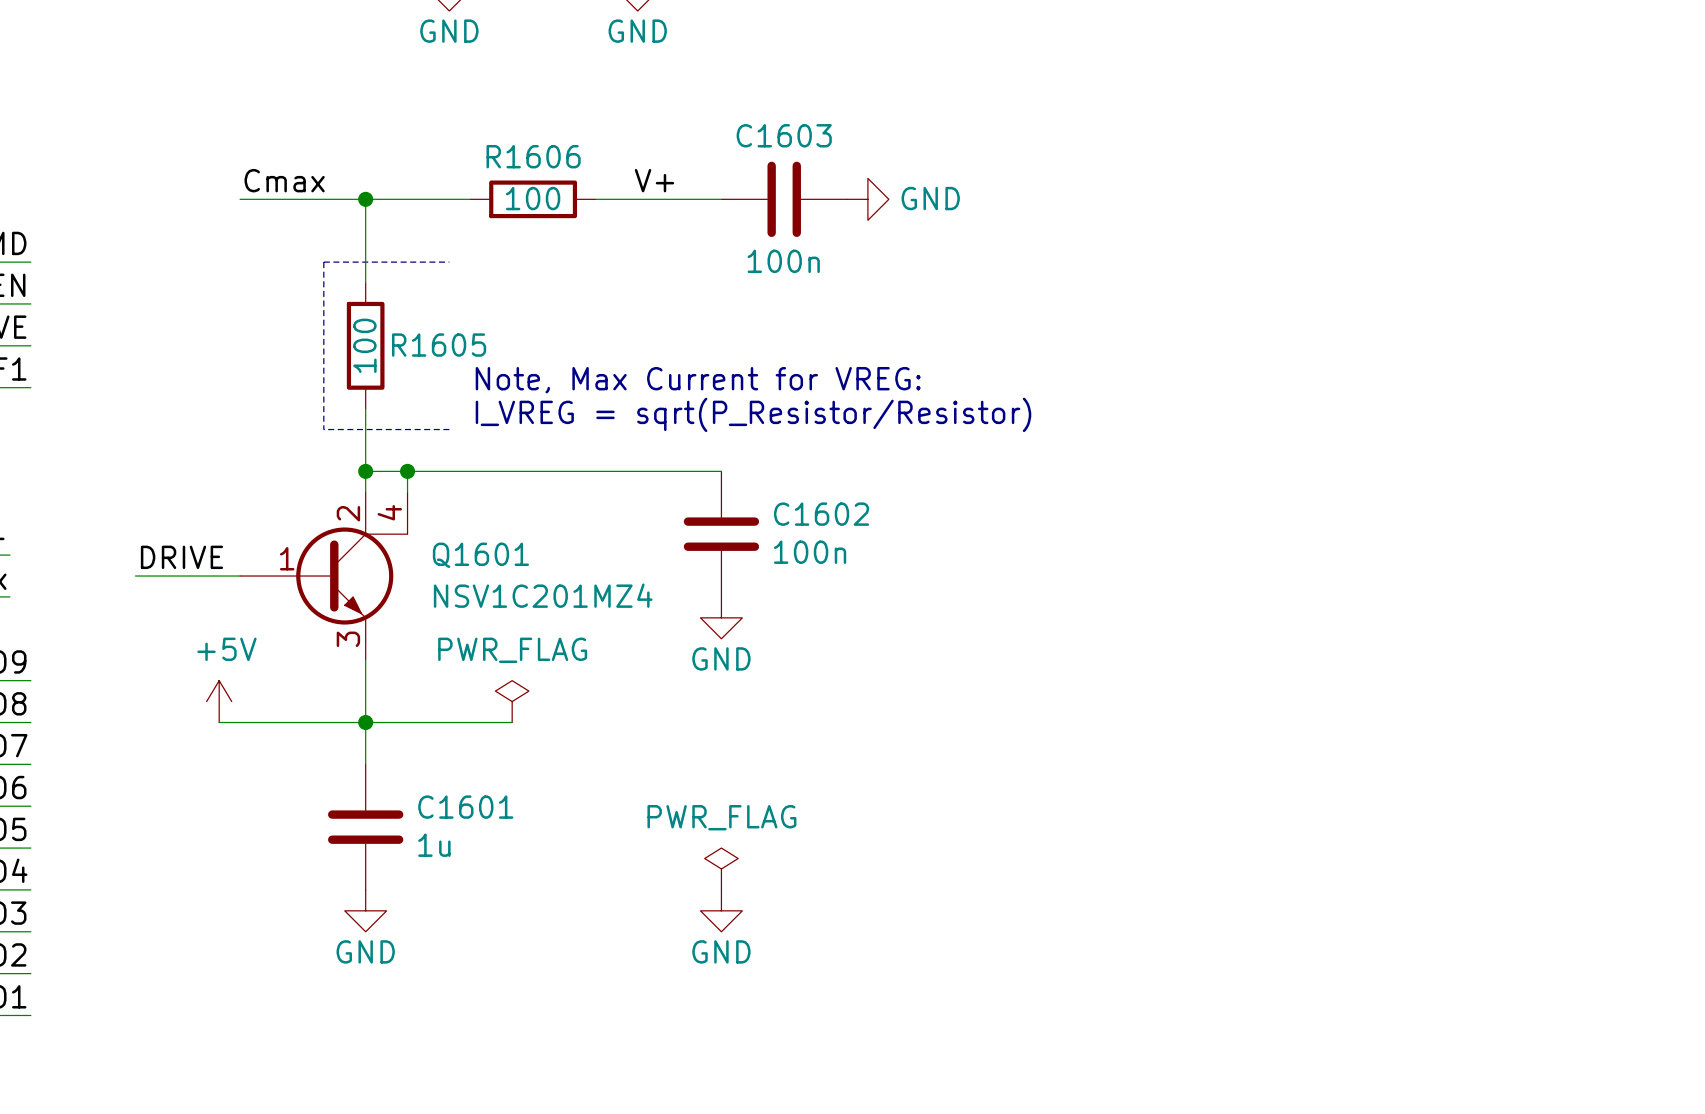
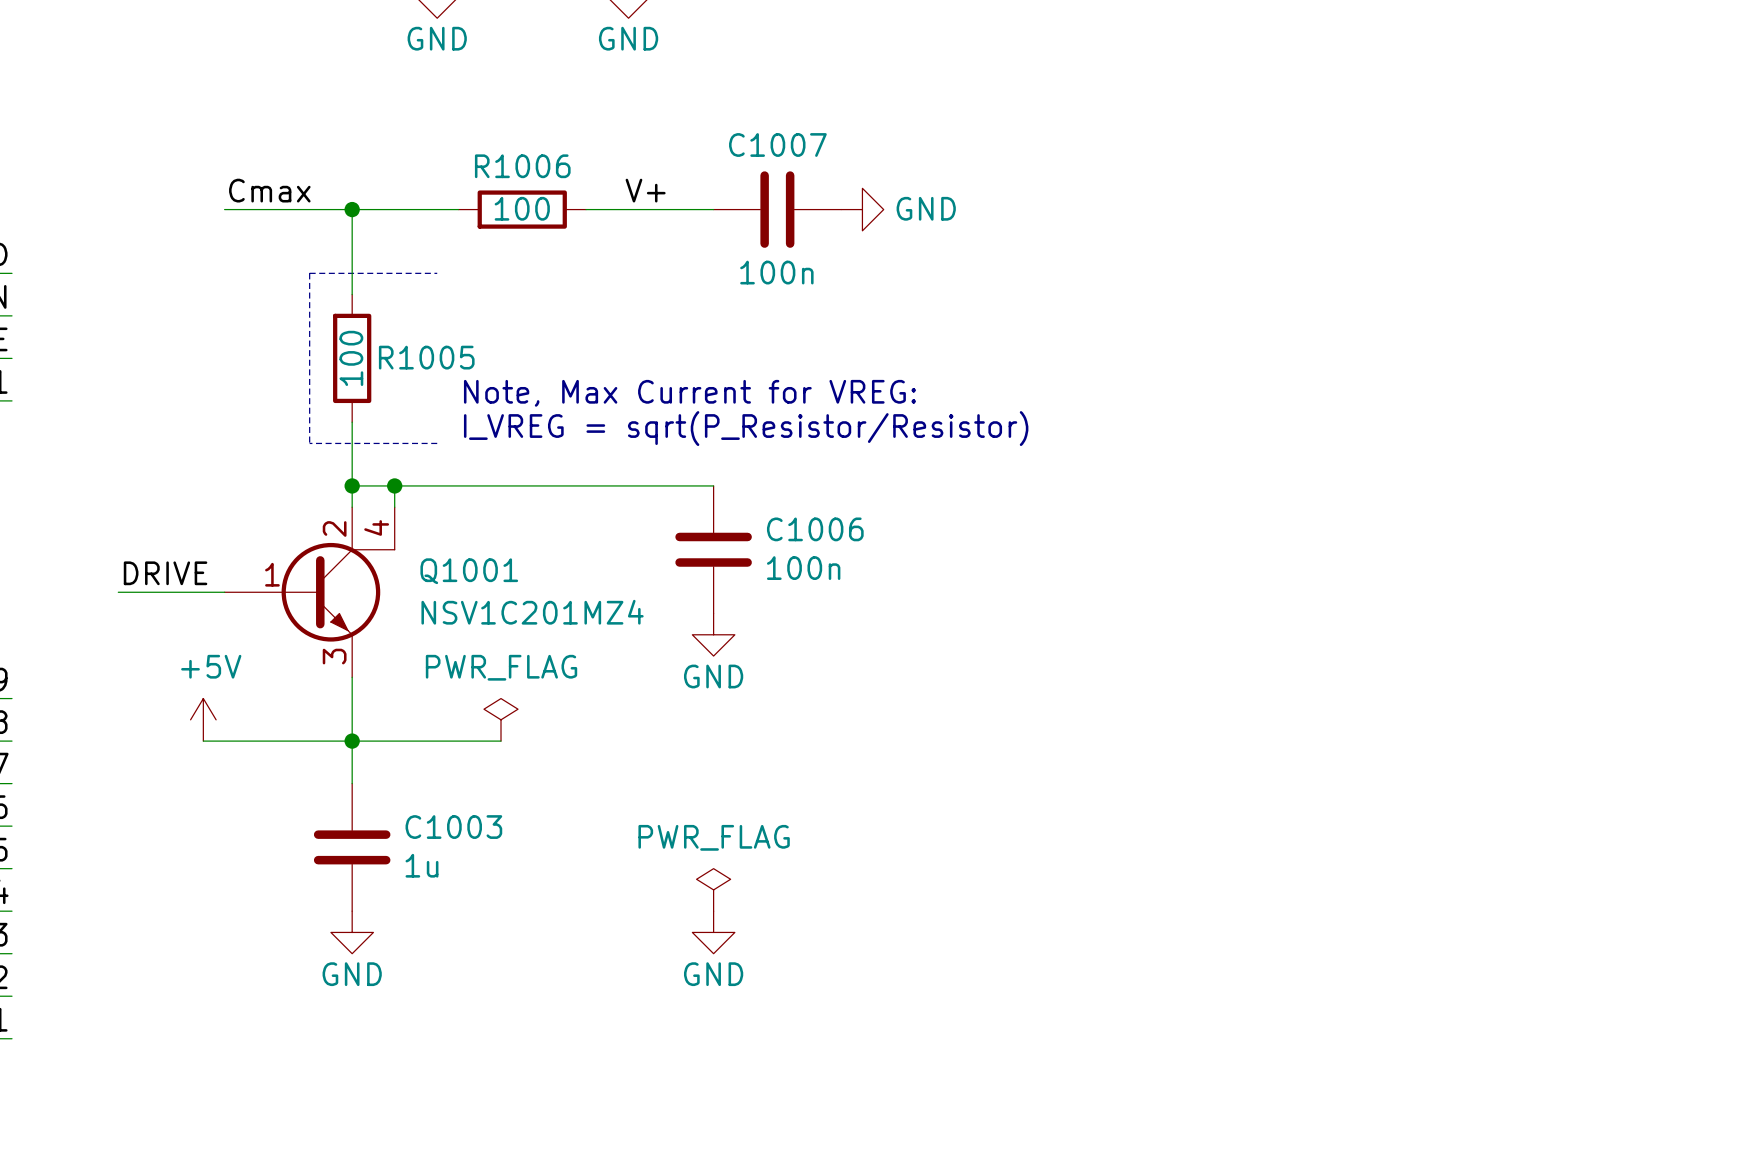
C1603 name: C1603 (784, 135) -> C1007 (777, 145)
R1606 name: R1606 (533, 156) -> R1006 (522, 166)
R1605 name: R1605 (439, 345) -> R1005 (426, 357)
C1602 name: C1602 (821, 514) -> C1006 (815, 529)
Q1601 name: Q1601 (480, 555) -> Q1001 (469, 571)
C1601 name: C1601 (465, 807) -> C1003 (453, 827)

